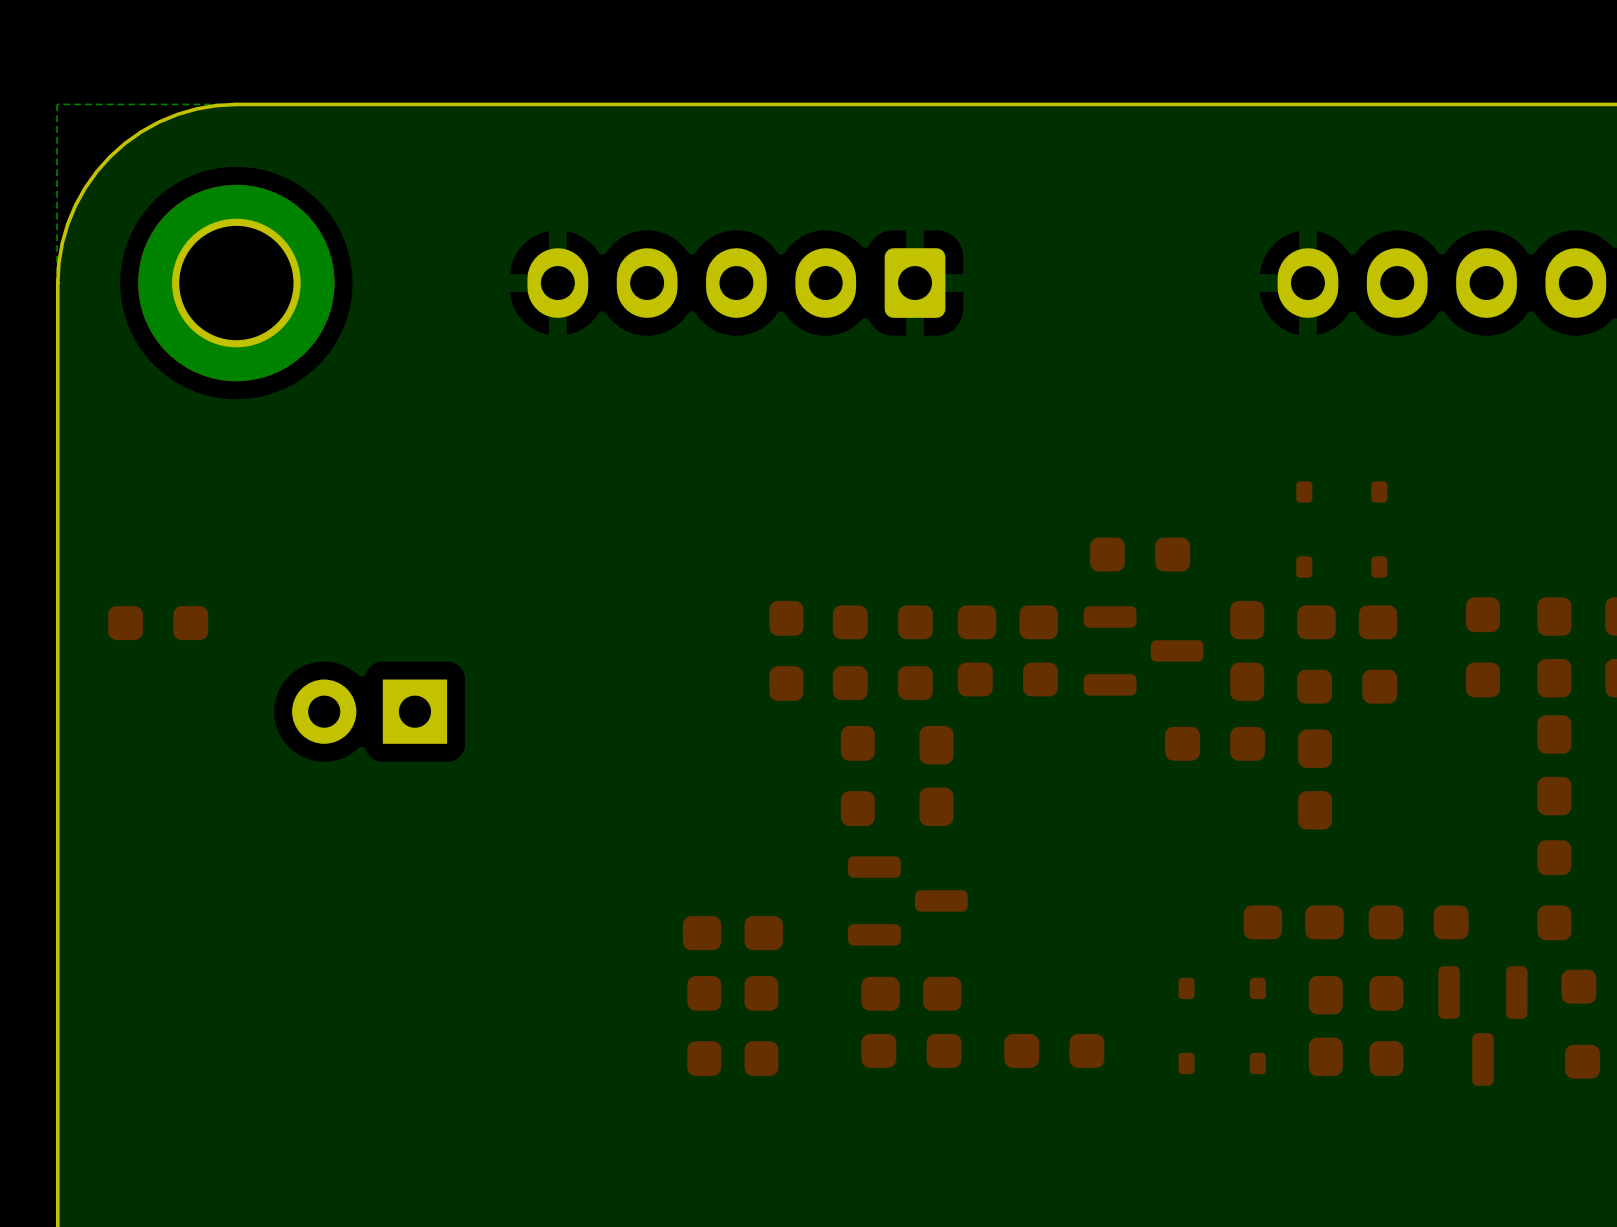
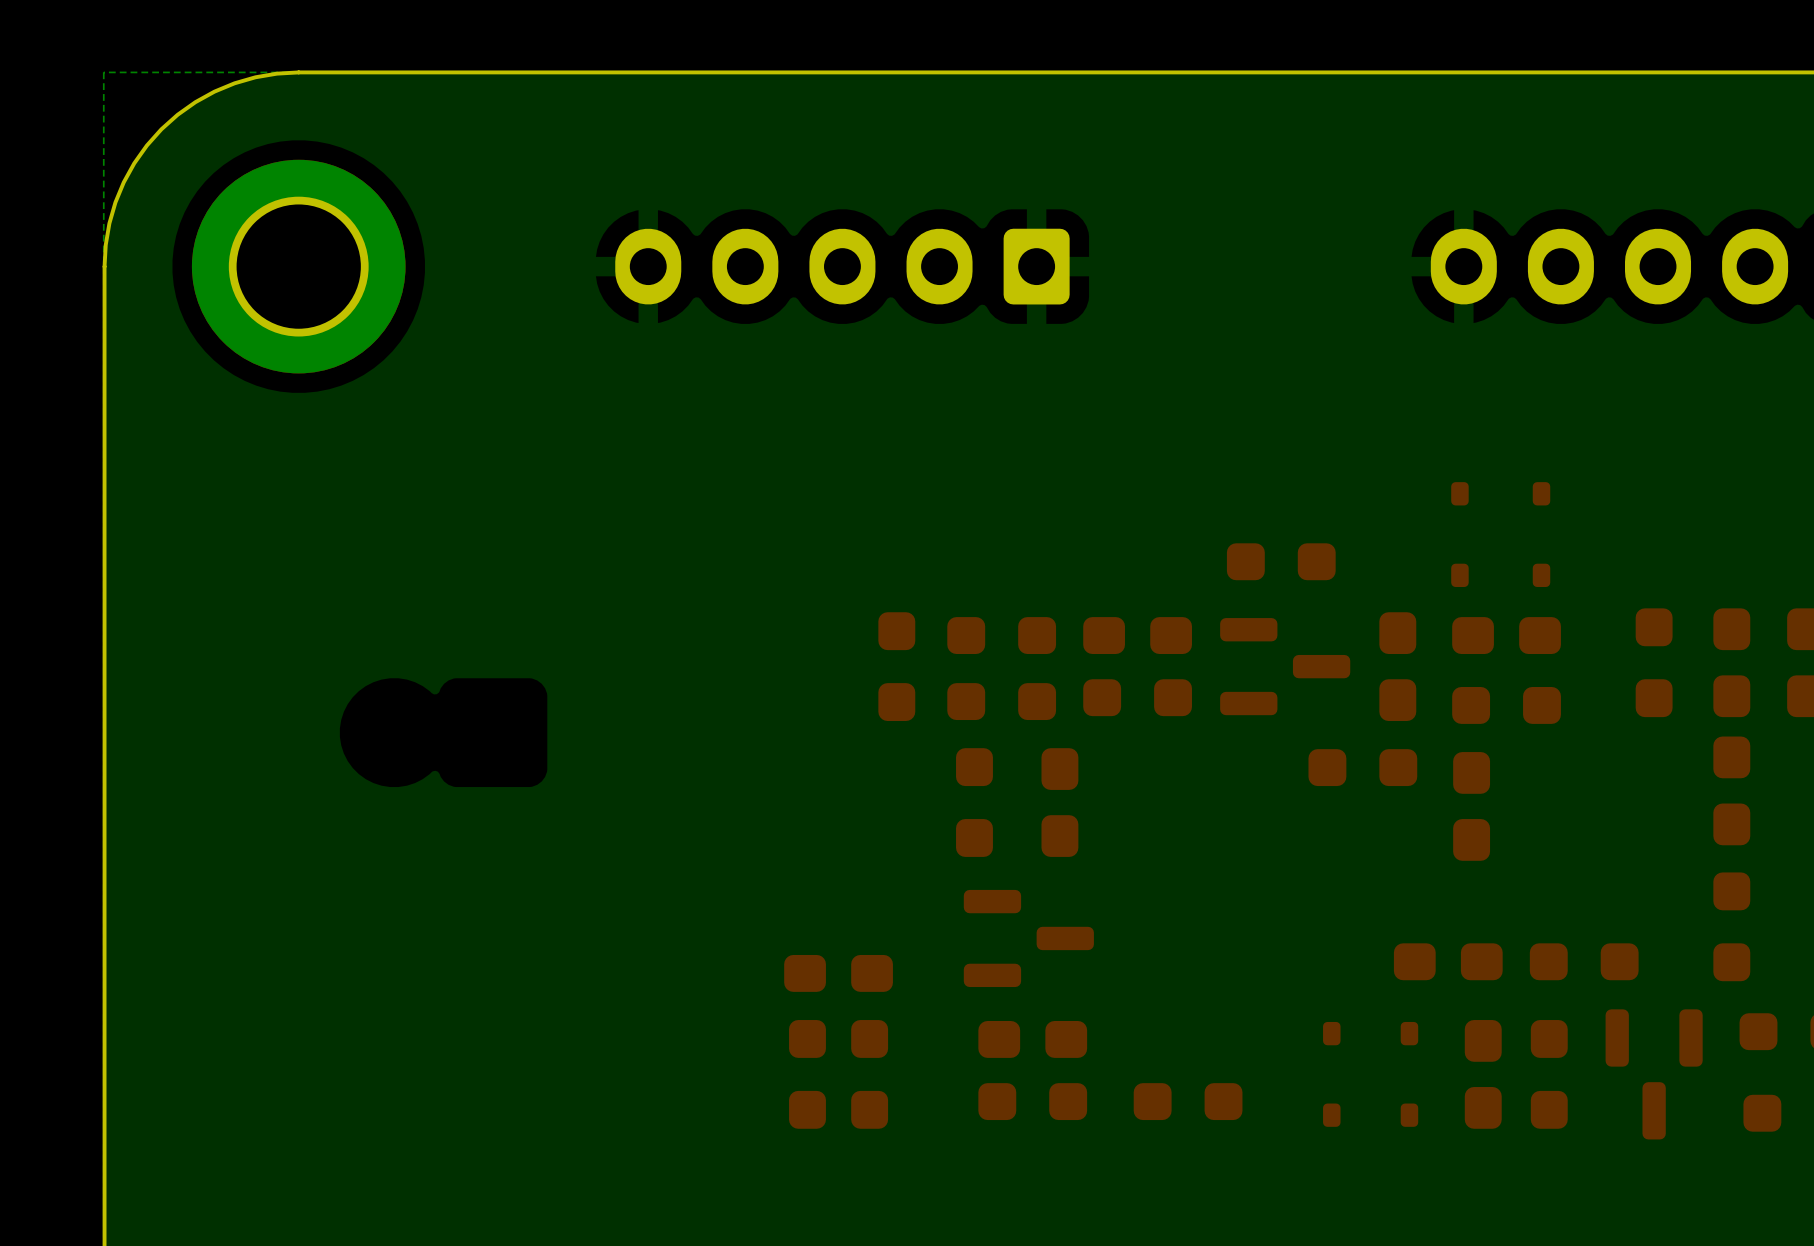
part: (158, 623) -> none
part: (369, 711) -> none

